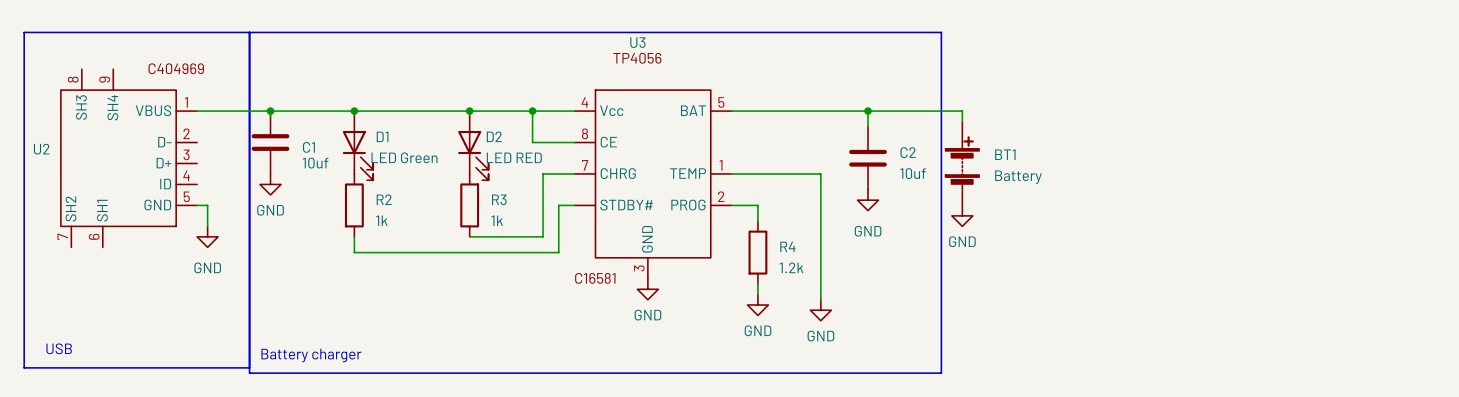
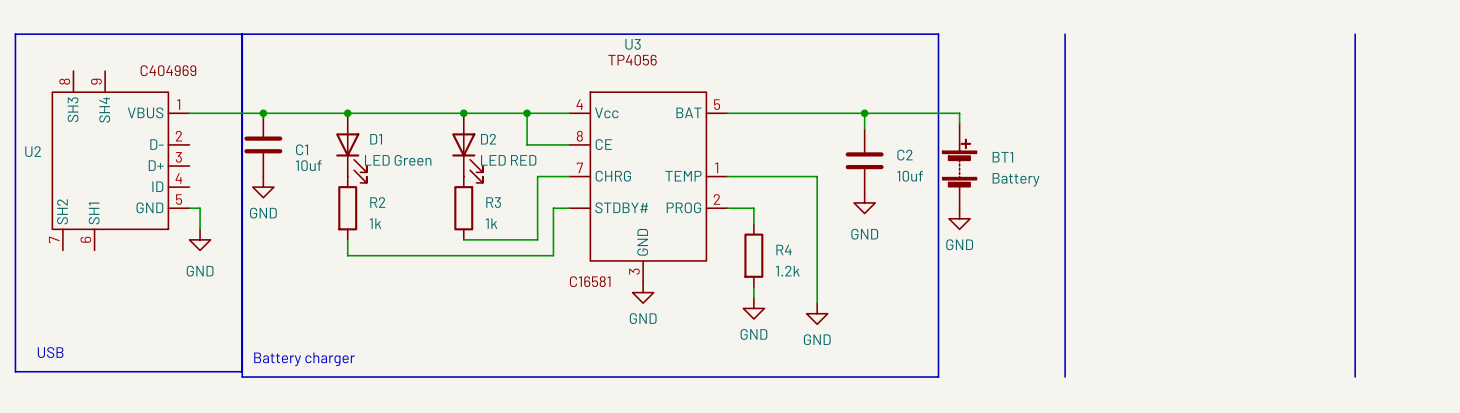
line: none -> (1065, 34) (1065, 377)
line: none -> (1355, 34) (1355, 377)

